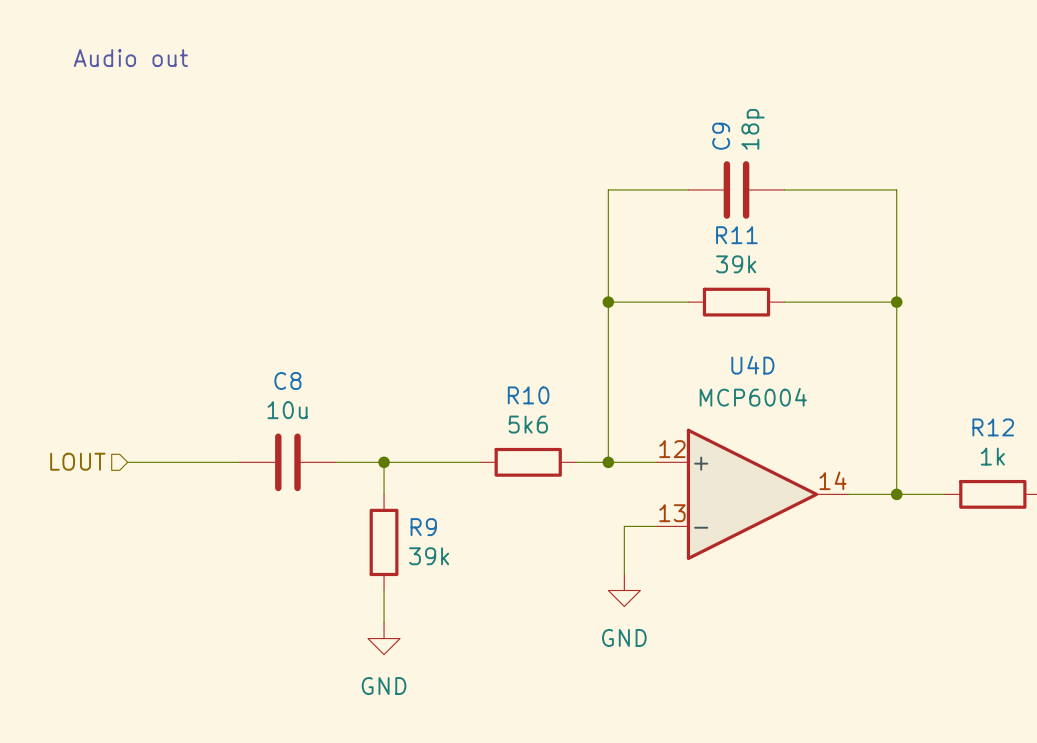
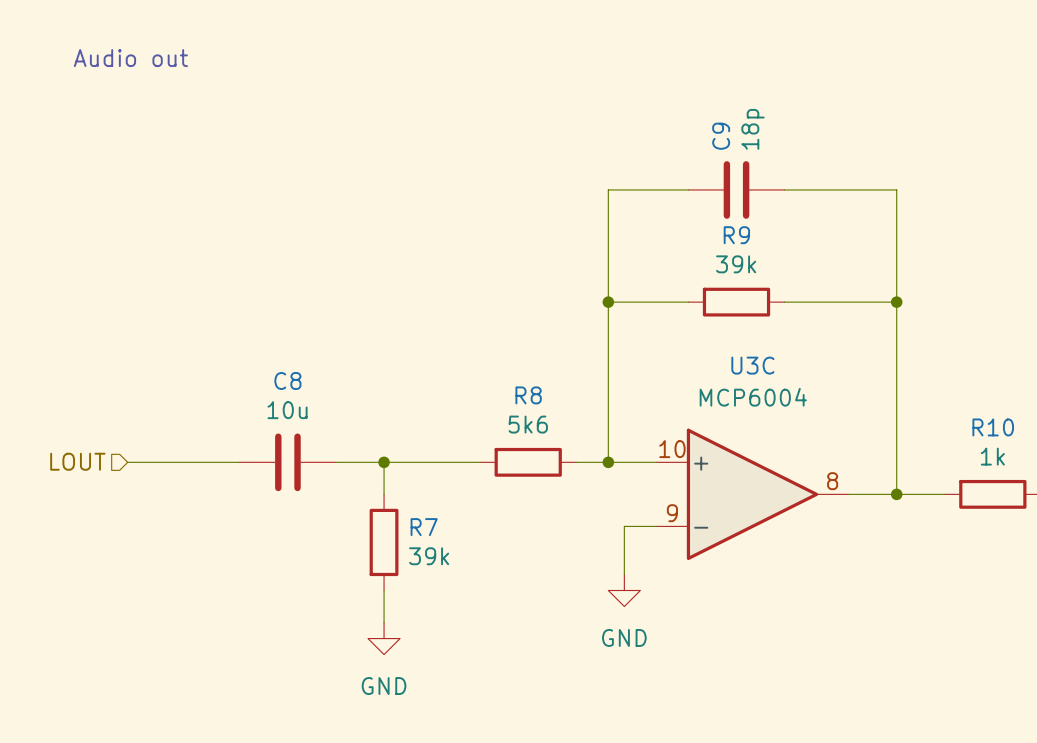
R11 name: R11 (736, 235) -> R9 (736, 235)
U4D name: U4D (752, 365) -> U3C (752, 365)
R10 name: R10 (528, 395) -> R8 (528, 395)
R12 name: R12 (993, 427) -> R10 (993, 427)
U4D pin number: 12 (672, 449) -> 10 (672, 449)
U4D pin number: 14 (833, 480) -> 8 (832, 481)
U4D pin number: 13 (672, 513) -> 9 (672, 513)
R9 name: R9 (423, 527) -> R7 (424, 527)

